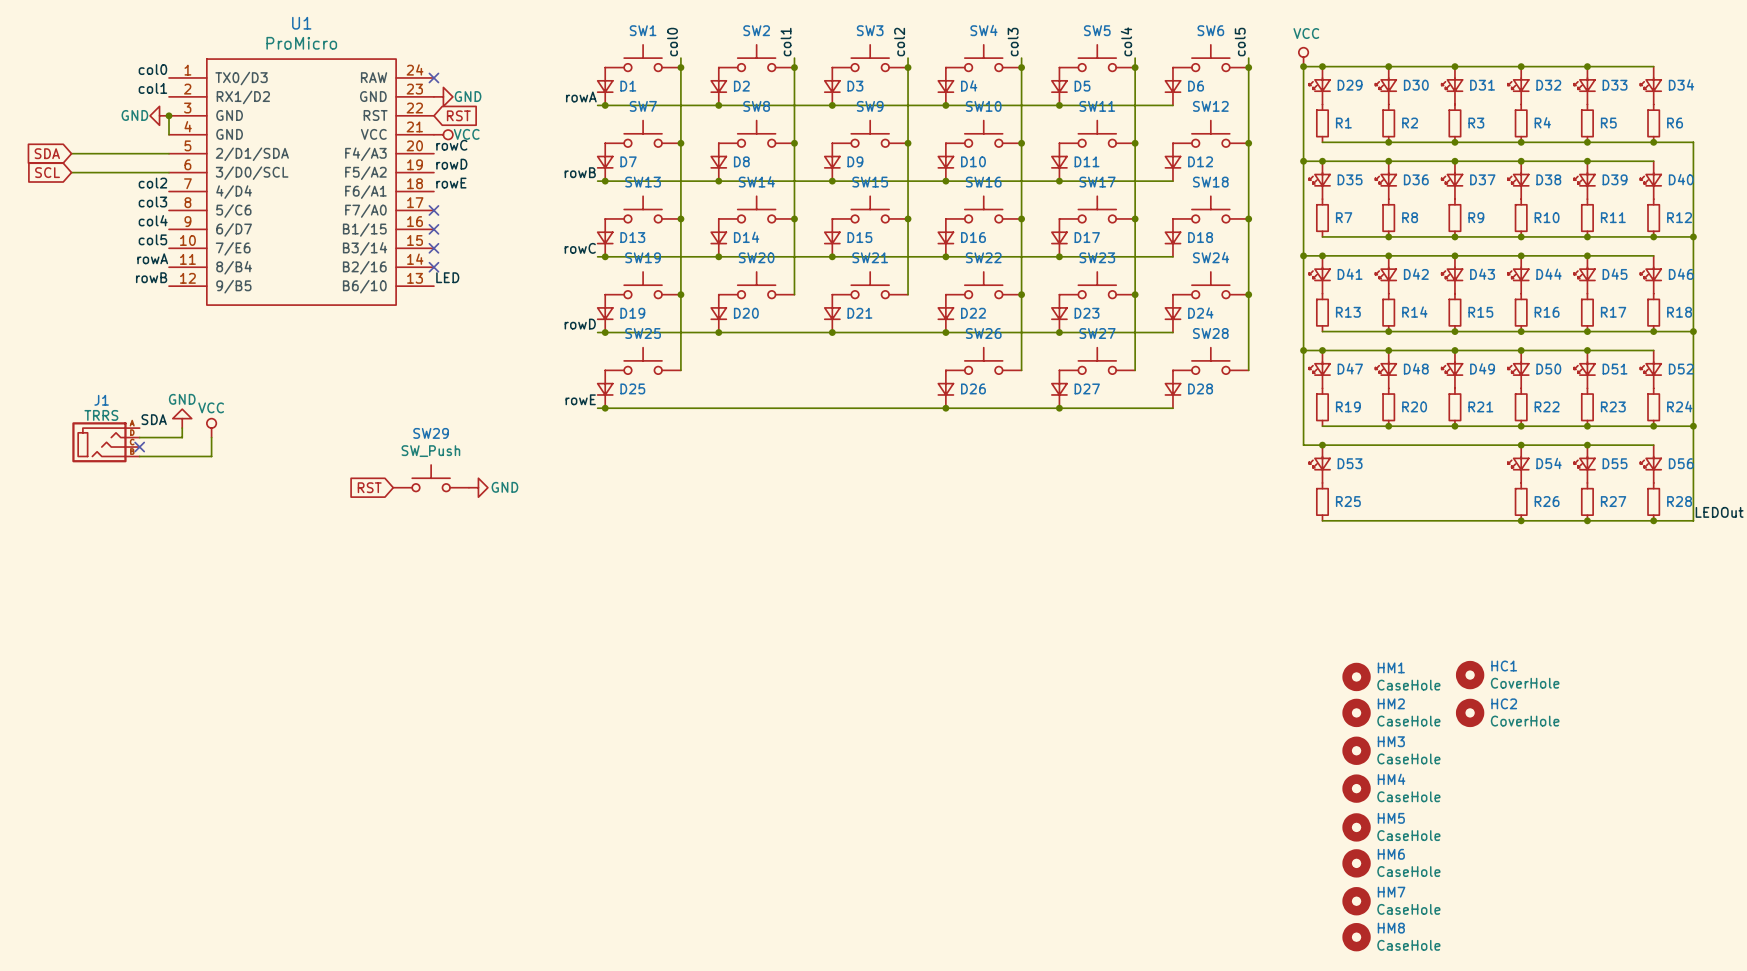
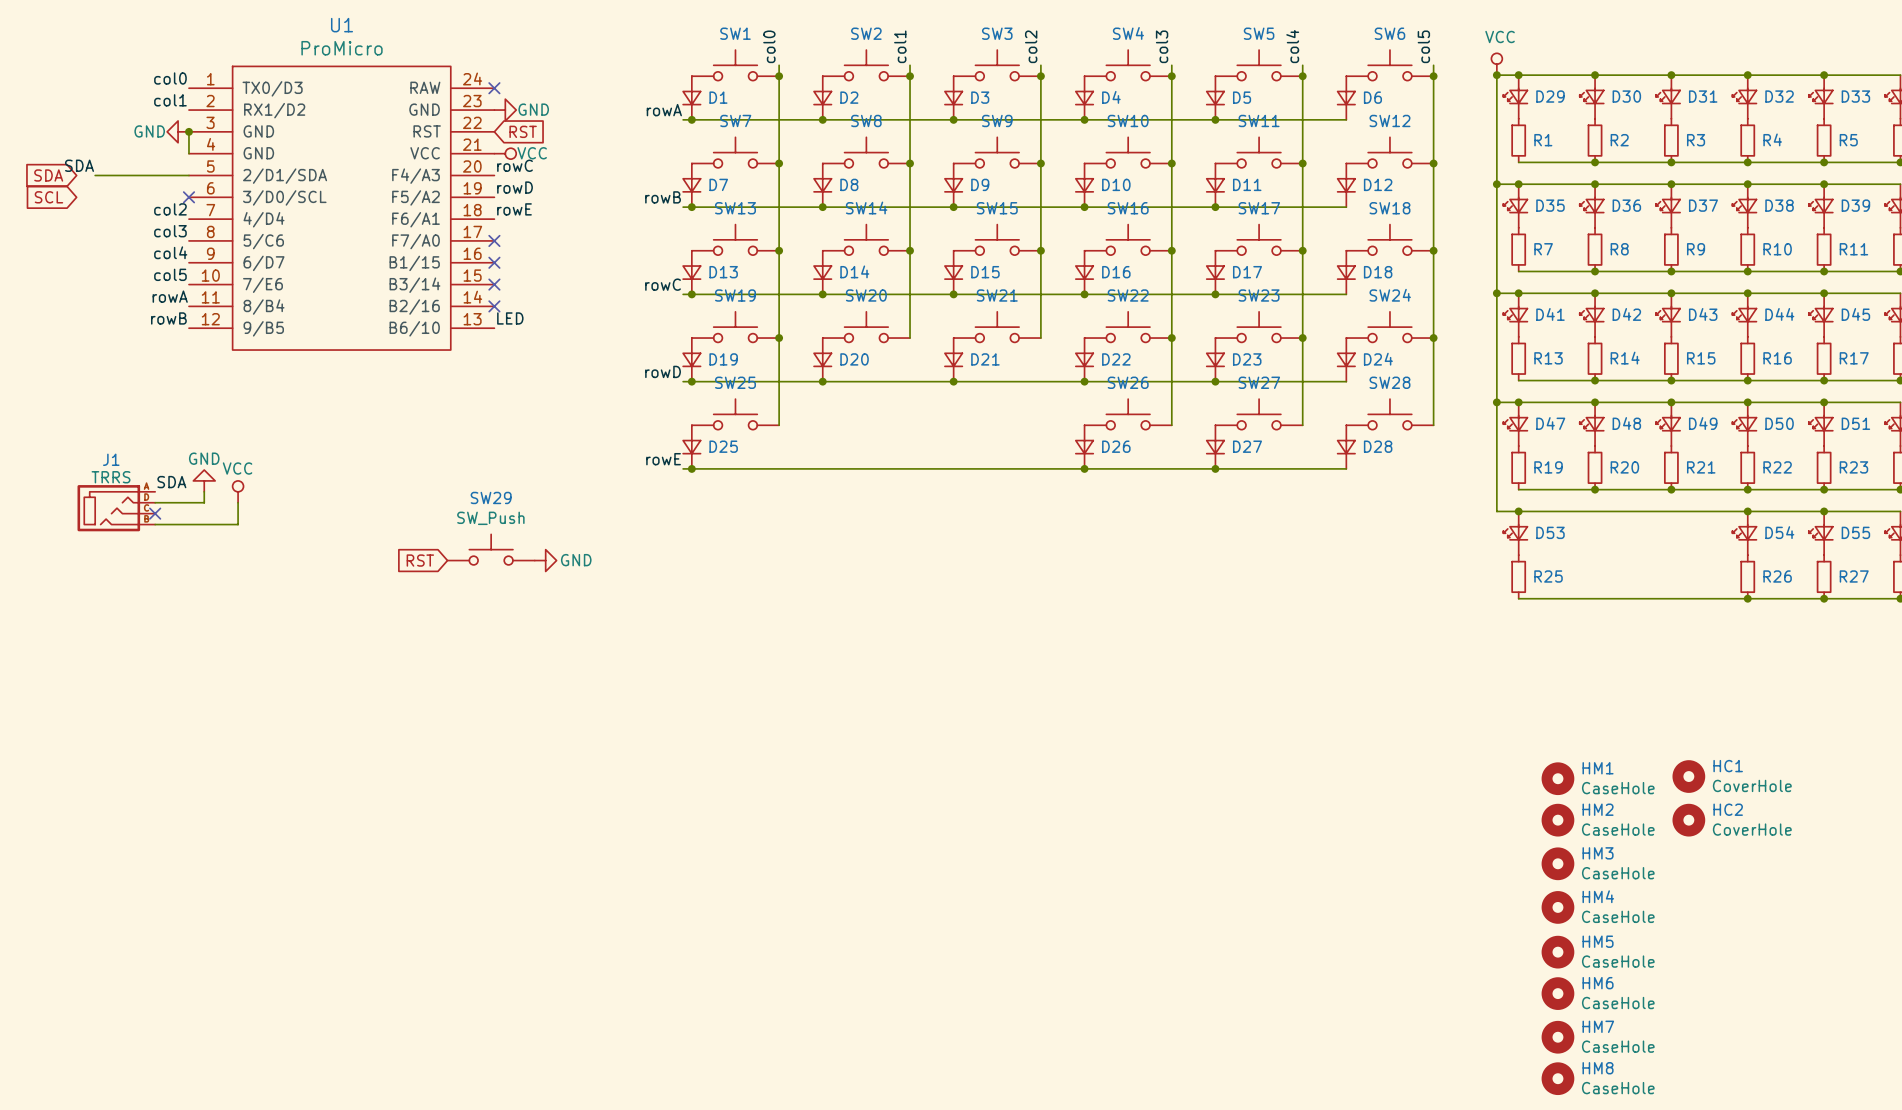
label: none -> SDA (79, 165)
wire: (71, 153) (87, 153) -> none
wire: (71, 172) (169, 172) -> none
no-connect mark: none -> (188, 197)

